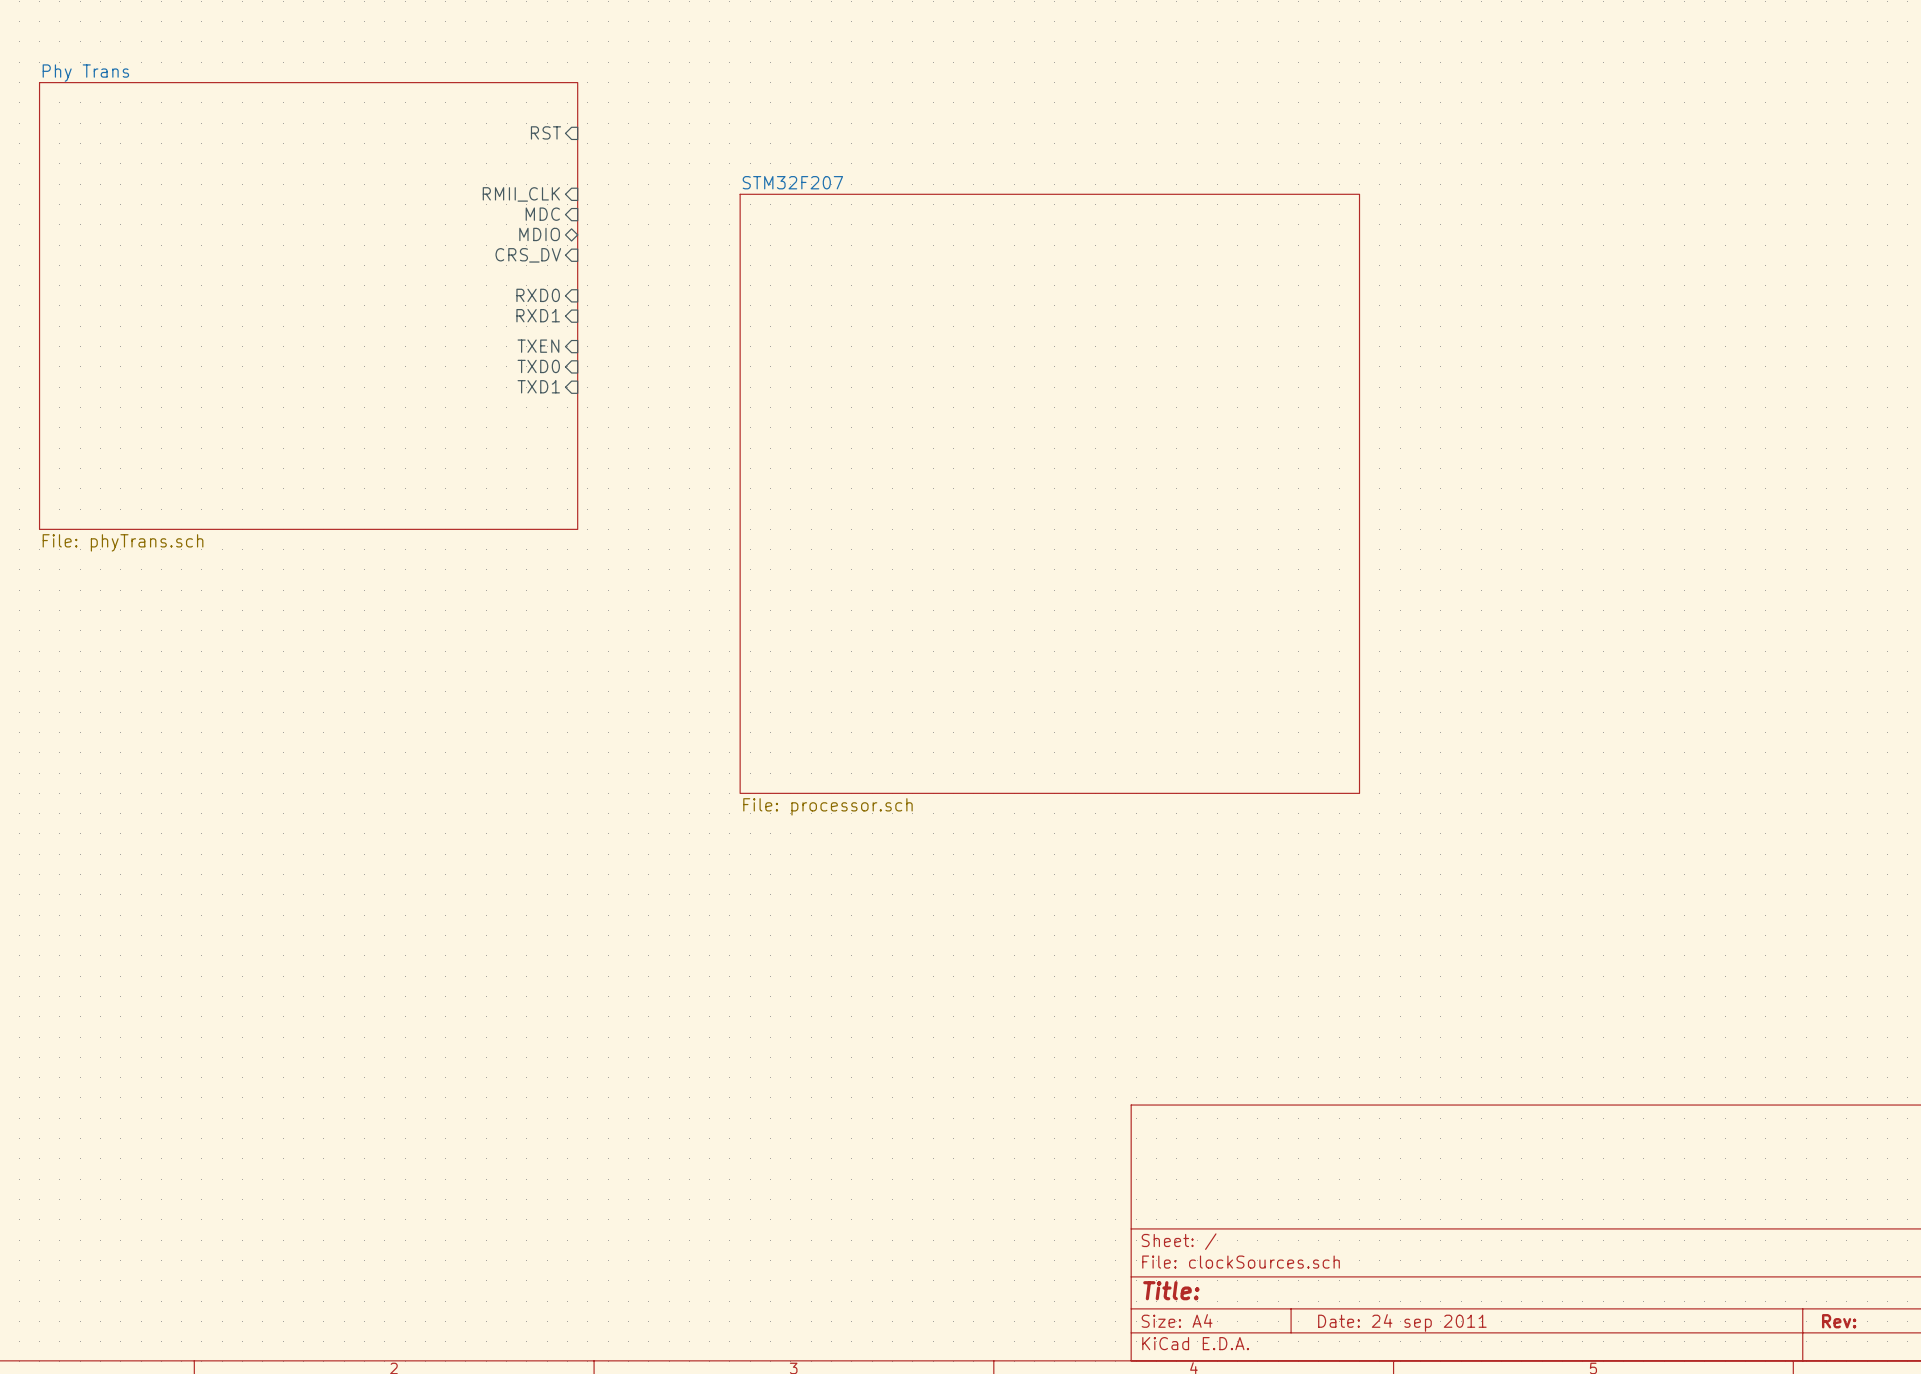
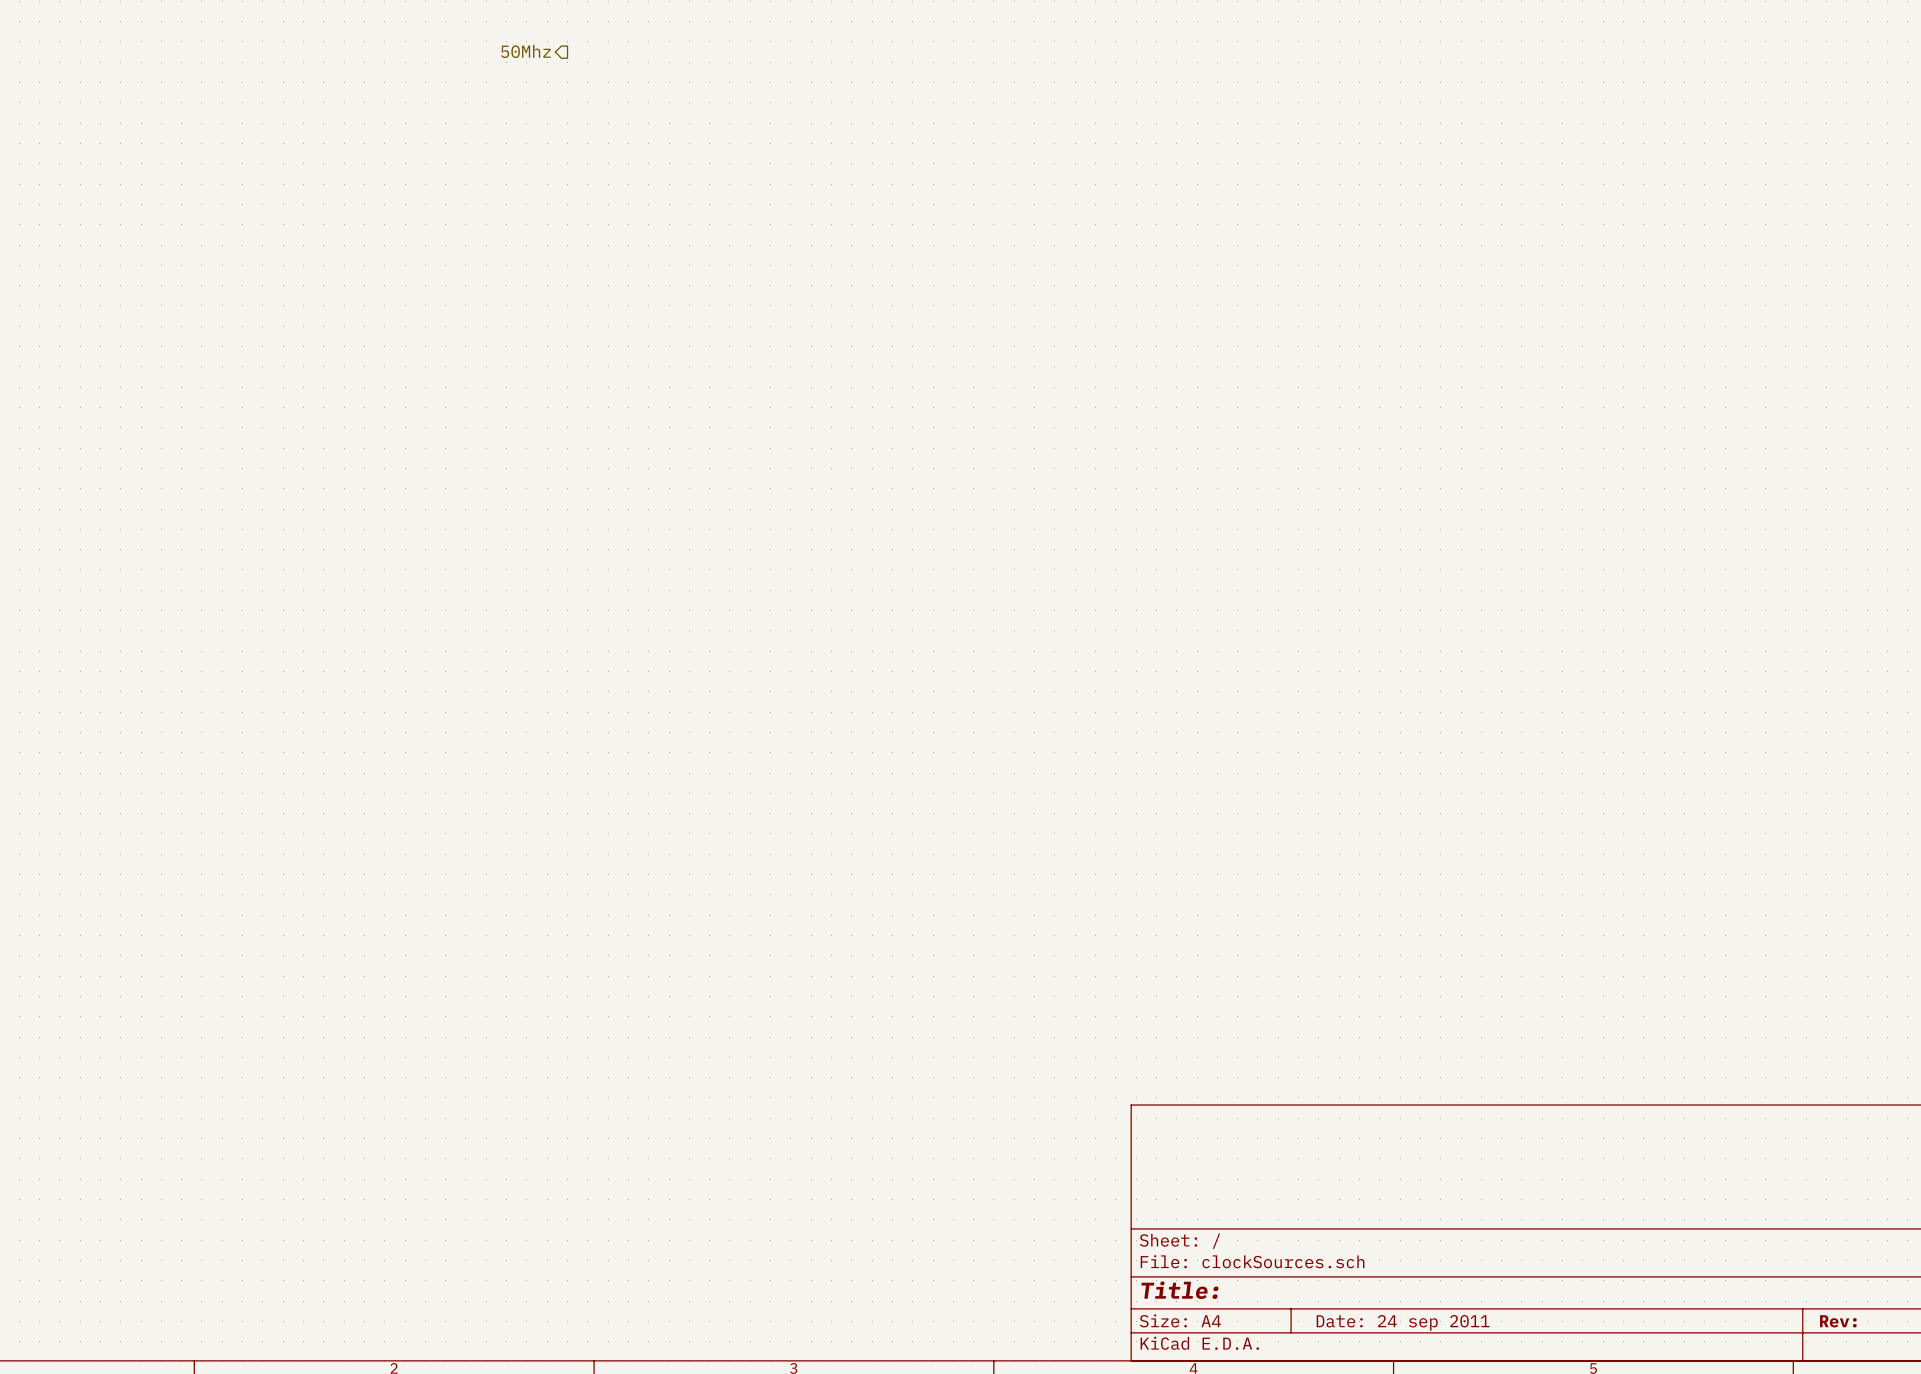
hierarchical label: none -> 50Mhz (526, 51)
sheet pin: RST (545, 132) -> none
sheet pin: RMII_CLK (521, 194) -> none
sheet pin: MDC (542, 214) -> none
sheet pin: MDIO (539, 234) -> none
sheet pin: CRS_DV (528, 255) -> none
sheet pin: RXD0 (538, 295) -> none
sheet Phy Trans: File: phyTrans.sch (308, 305) -> none
sheet pin: RXD1 (538, 315) -> none
sheet pin: TXEN (538, 346) -> none
sheet pin: TXD0 (538, 366) -> none
sheet pin: TXD1 (538, 386) -> none
sheet STM32F207: File: processor.sch (1049, 493) -> none

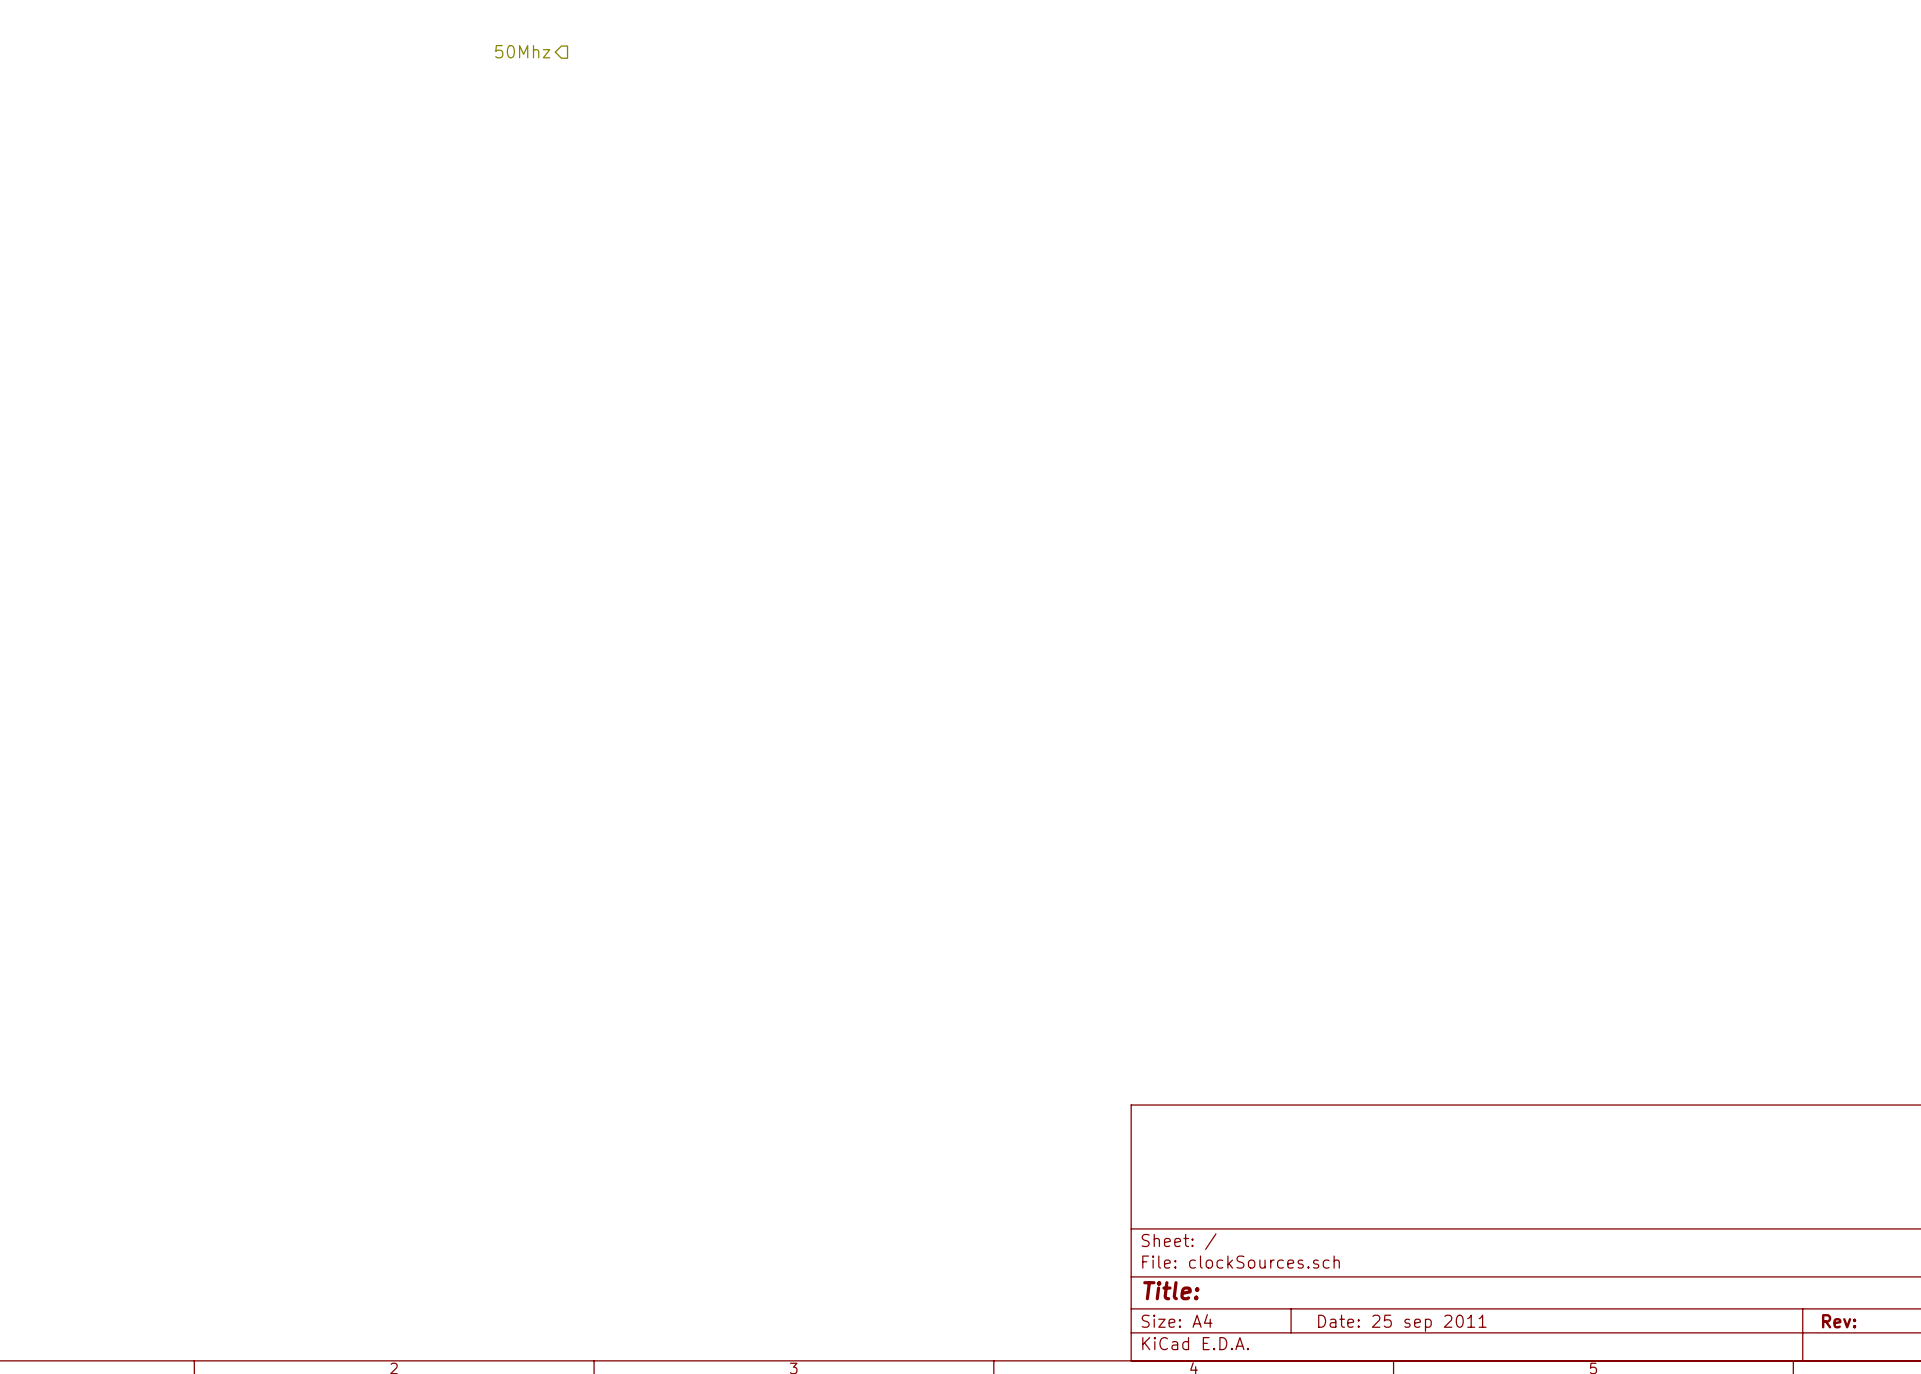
title block: Date: 24 sep 2011 (1403, 1322) -> Date: 25 sep 2011 (1402, 1323)

